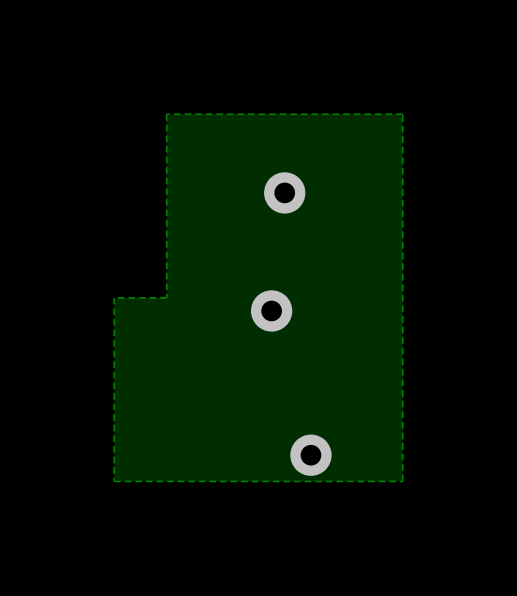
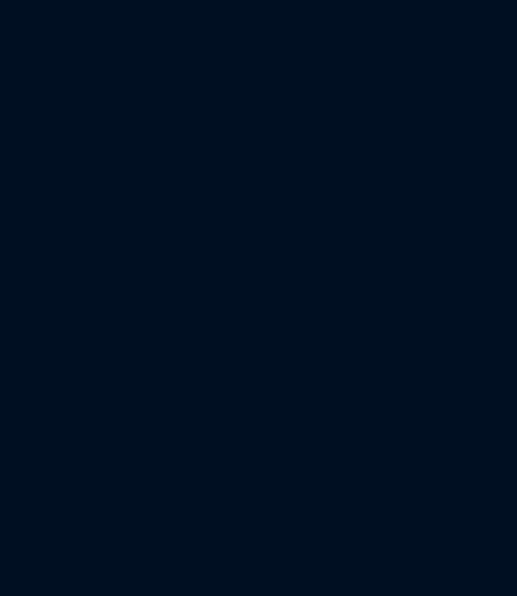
zone outline: (402, 114) (402, 481) (114, 481) (114, 297) (166, 297) (166, 114) (402, 114) -> none
via: (284, 192) -> none
via: (271, 310) -> none
via: (310, 455) -> none

